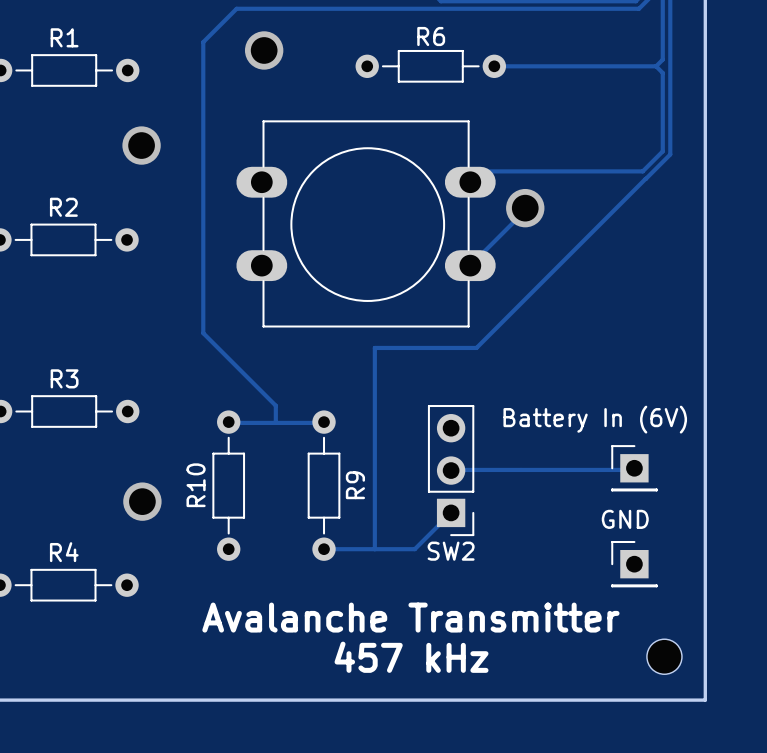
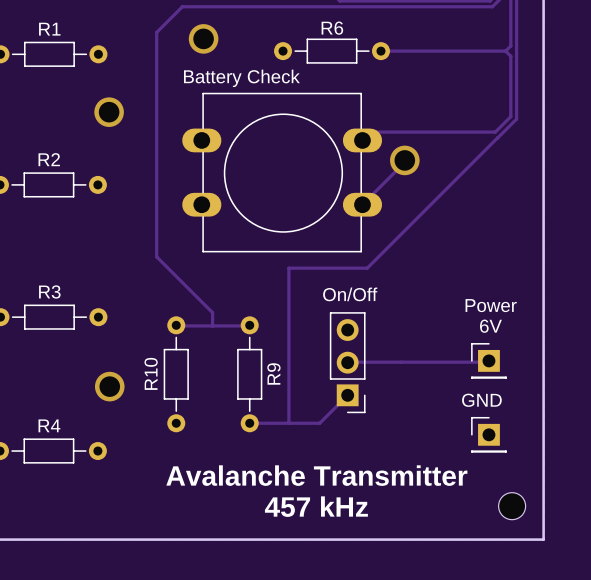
text: none -> Battery Check (241, 78)
text: none -> Power (491, 305)
Battery In (6V) name: Battery In (6V) (595, 419) -> none
text: none -> 6V (490, 326)
SW2 name: SW2 (451, 551) -> On/Off (350, 294)

